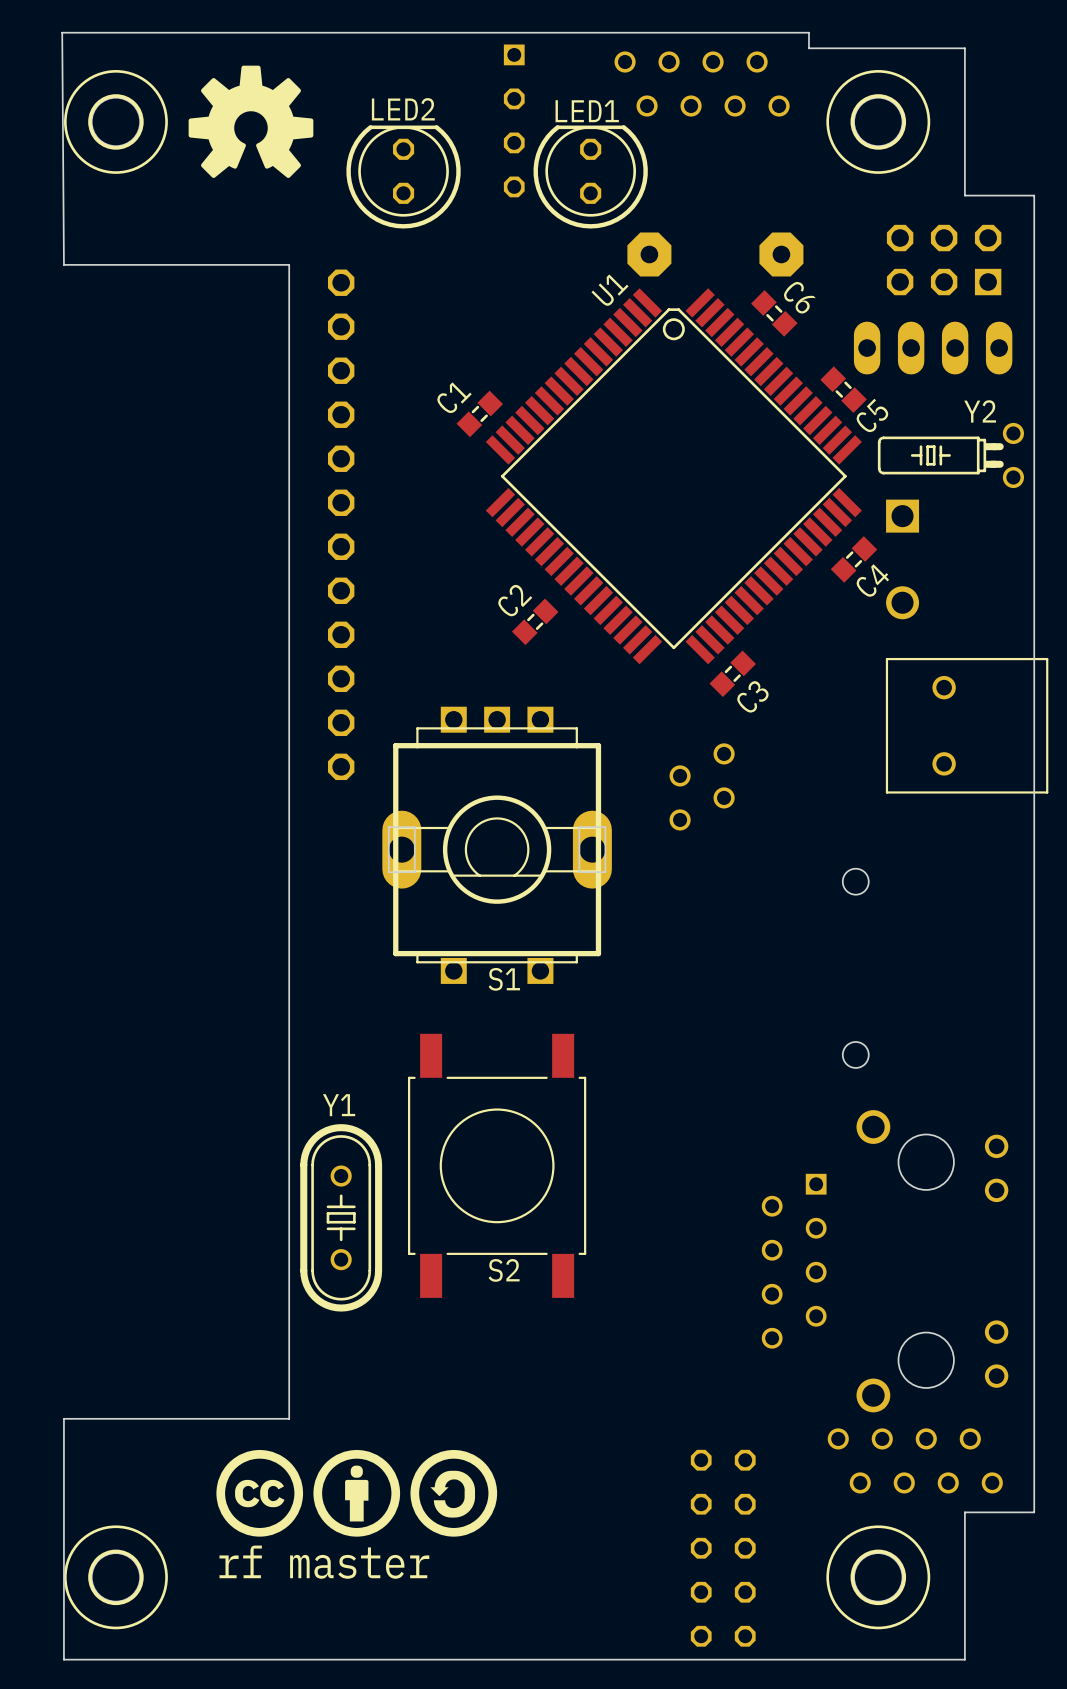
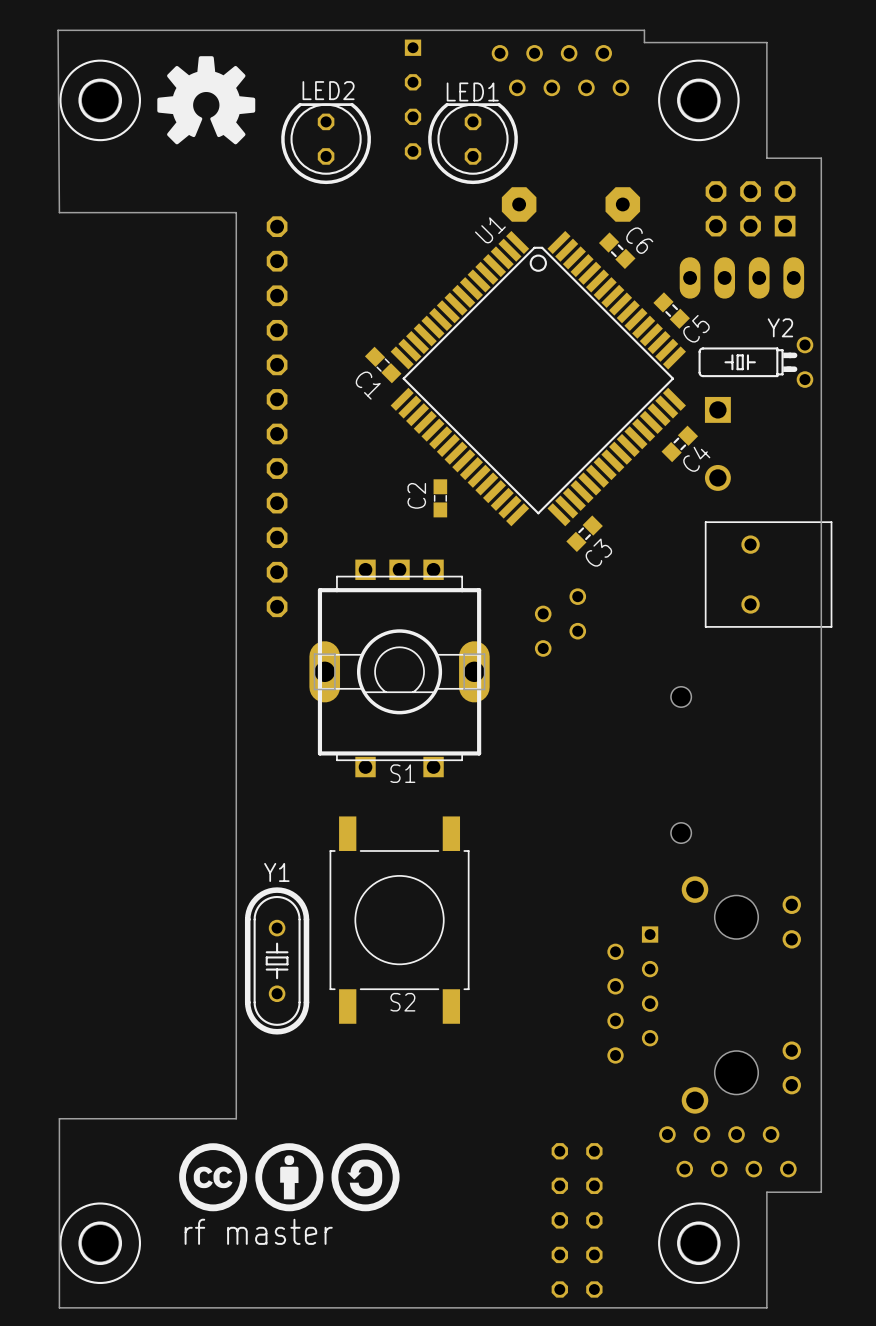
C1 footprint: [456, 390, 504, 438] -> [364, 346, 402, 384]
C1 name position: C1 (454, 398) -> C1 (368, 385)
C2 footprint: [511, 598, 559, 646] -> [433, 479, 448, 518]

